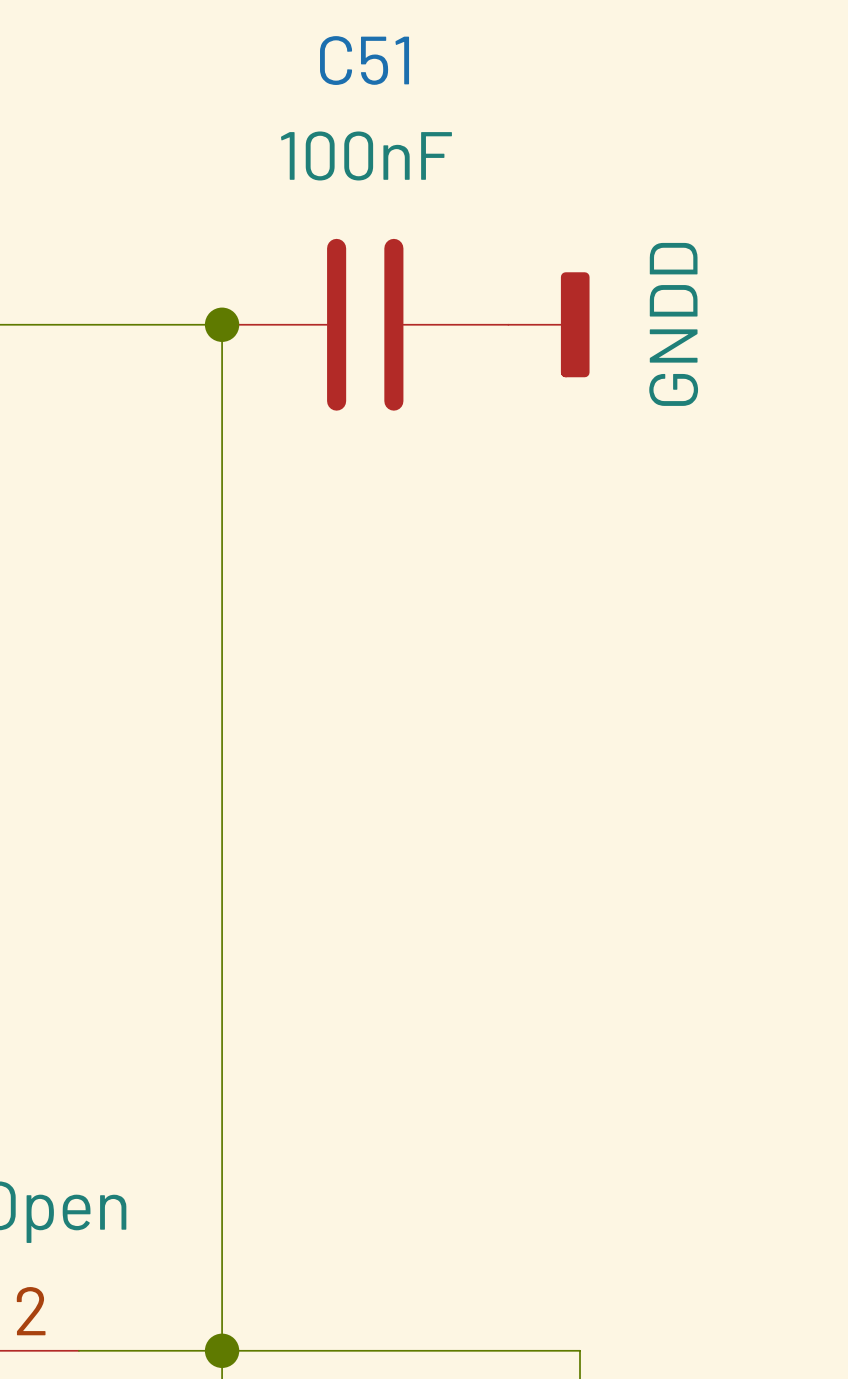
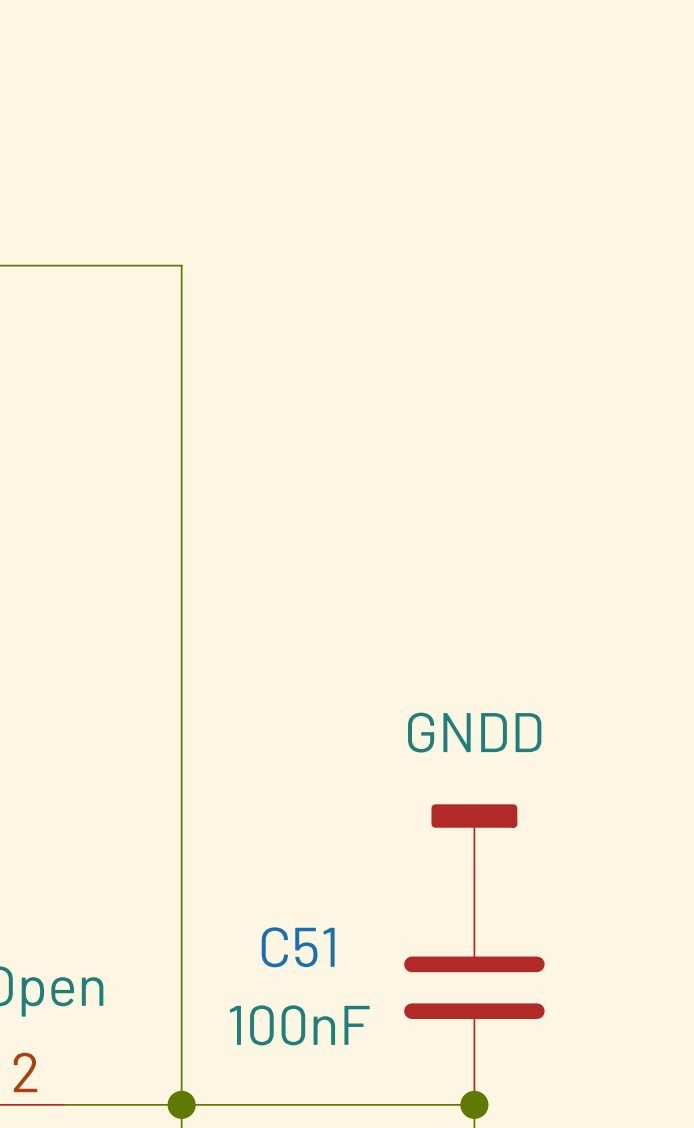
C51 name position: C51 (364, 60) -> C51 (298, 947)
C51 value position: 100nF (366, 155) -> 100nF (299, 1025)
junction: (222, 324) -> none
C51 rotation: 0° (365, 324) -> 90° clockwise (474, 987)
C51 position: (365, 324) -> (474, 987)
power symbol rotation: 0° (548, 324) -> 90° counterclockwise (474, 837)
power symbol position: GNDD (548, 324) -> GNDD (474, 837)
junction: none -> (474, 1104)

